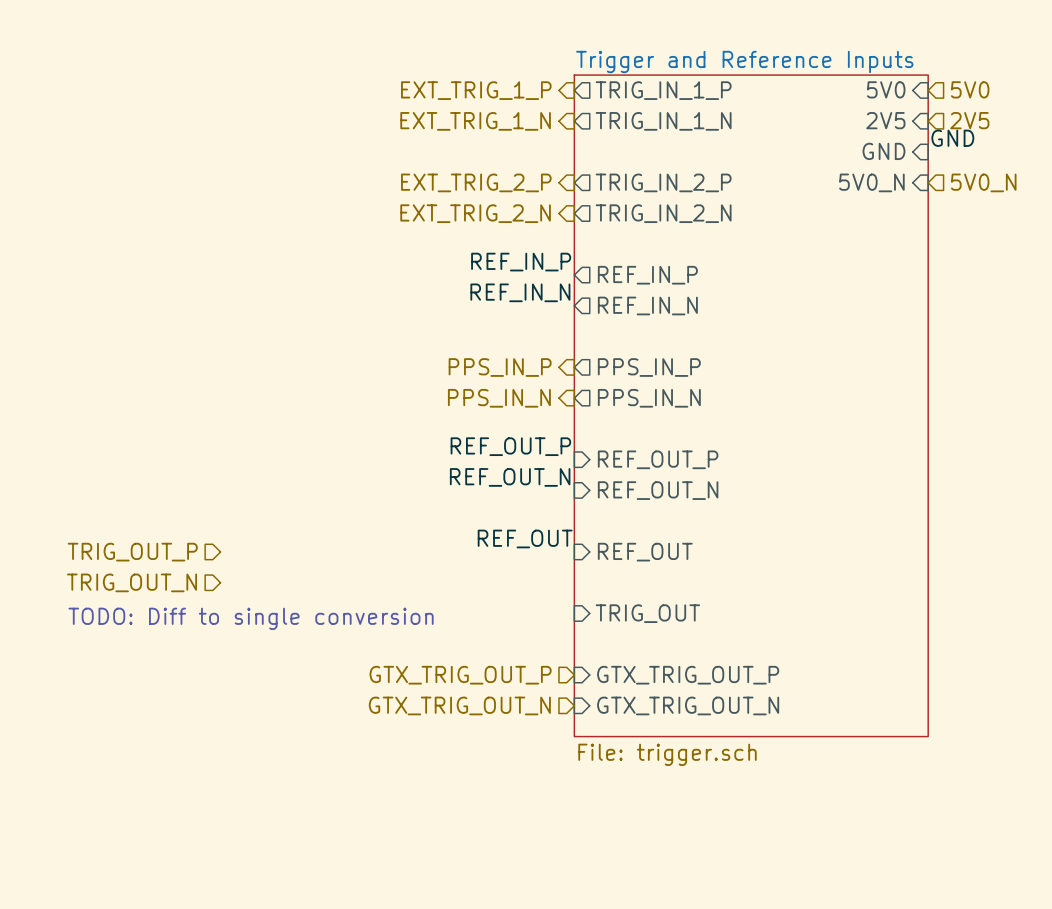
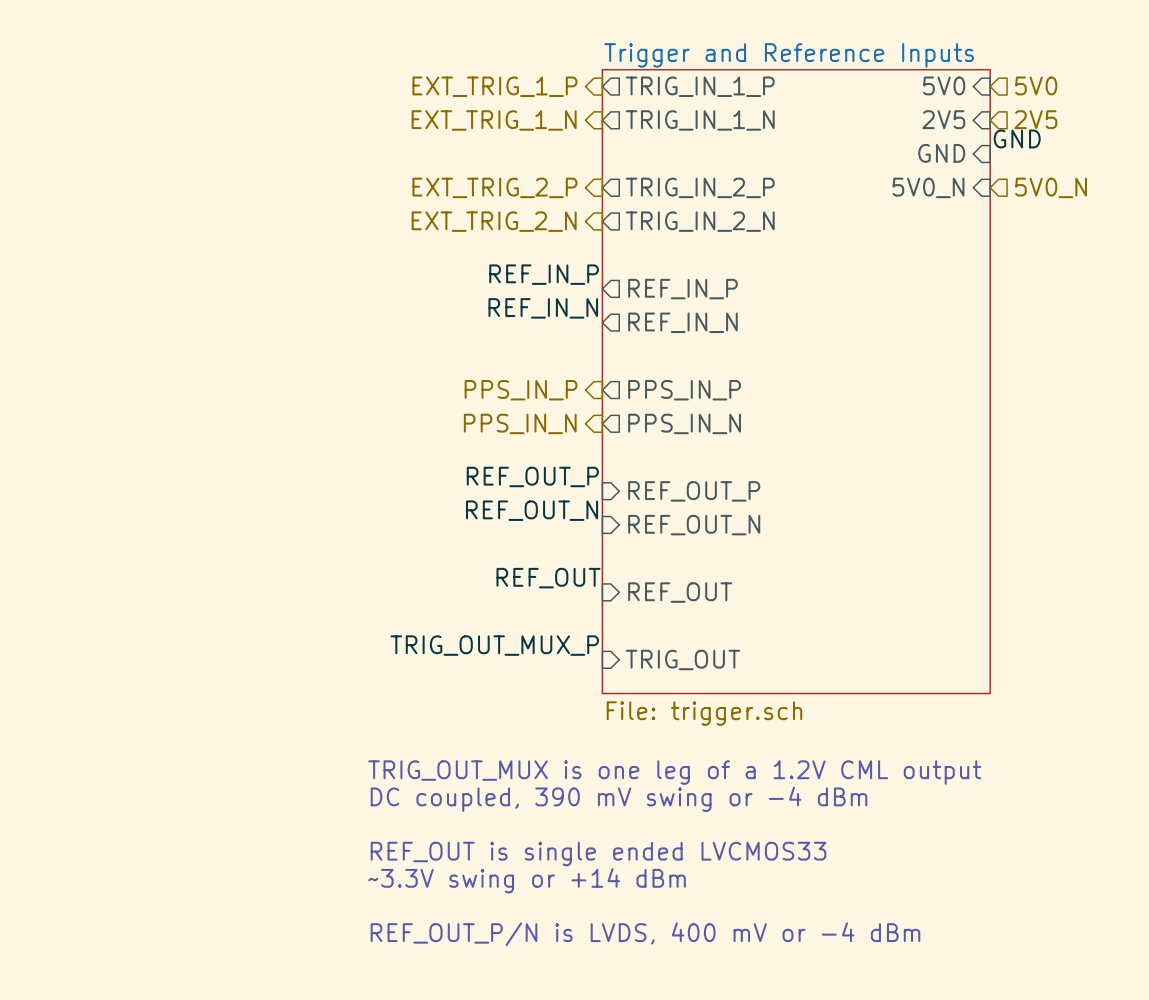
sheet Trigger and Reference Inputs: none -> File: trigger.sch (796, 381)
sheet Trigger and Reference Inputs: File: trigger.sch (751, 405) -> none
hierarchical label: TRIG_OUT_P (132, 552) -> none
hierarchical label: TRIG_OUT_N (132, 582) -> none
label: none -> TRIG_OUT_MUX_P (494, 645)
text: TODO: Diff to single conversion (251, 618) -> none
hierarchical label: GTX_TRIG_OUT_P (460, 675) -> none
sheet pin: GTX_TRIG_OUT_P (688, 675) -> none
hierarchical label: GTX_TRIG_OUT_N (459, 705) -> none
sheet pin: GTX_TRIG_OUT_N (688, 705) -> none
text: none -> TRIG_OUT_MUX is one leg of a 1.2V CML output (674, 772)
text: none -> DC coupled, 390 mV swing or -4 dBm (618, 799)
text: none -> REF_OUT is single ended LVCMOS33 (598, 854)
text: none -> ~3.3V swing or +14 dBm (527, 880)
text: none -> REF_OUT_P/N is LVDS, 400 mV or -4 dBm (645, 934)

